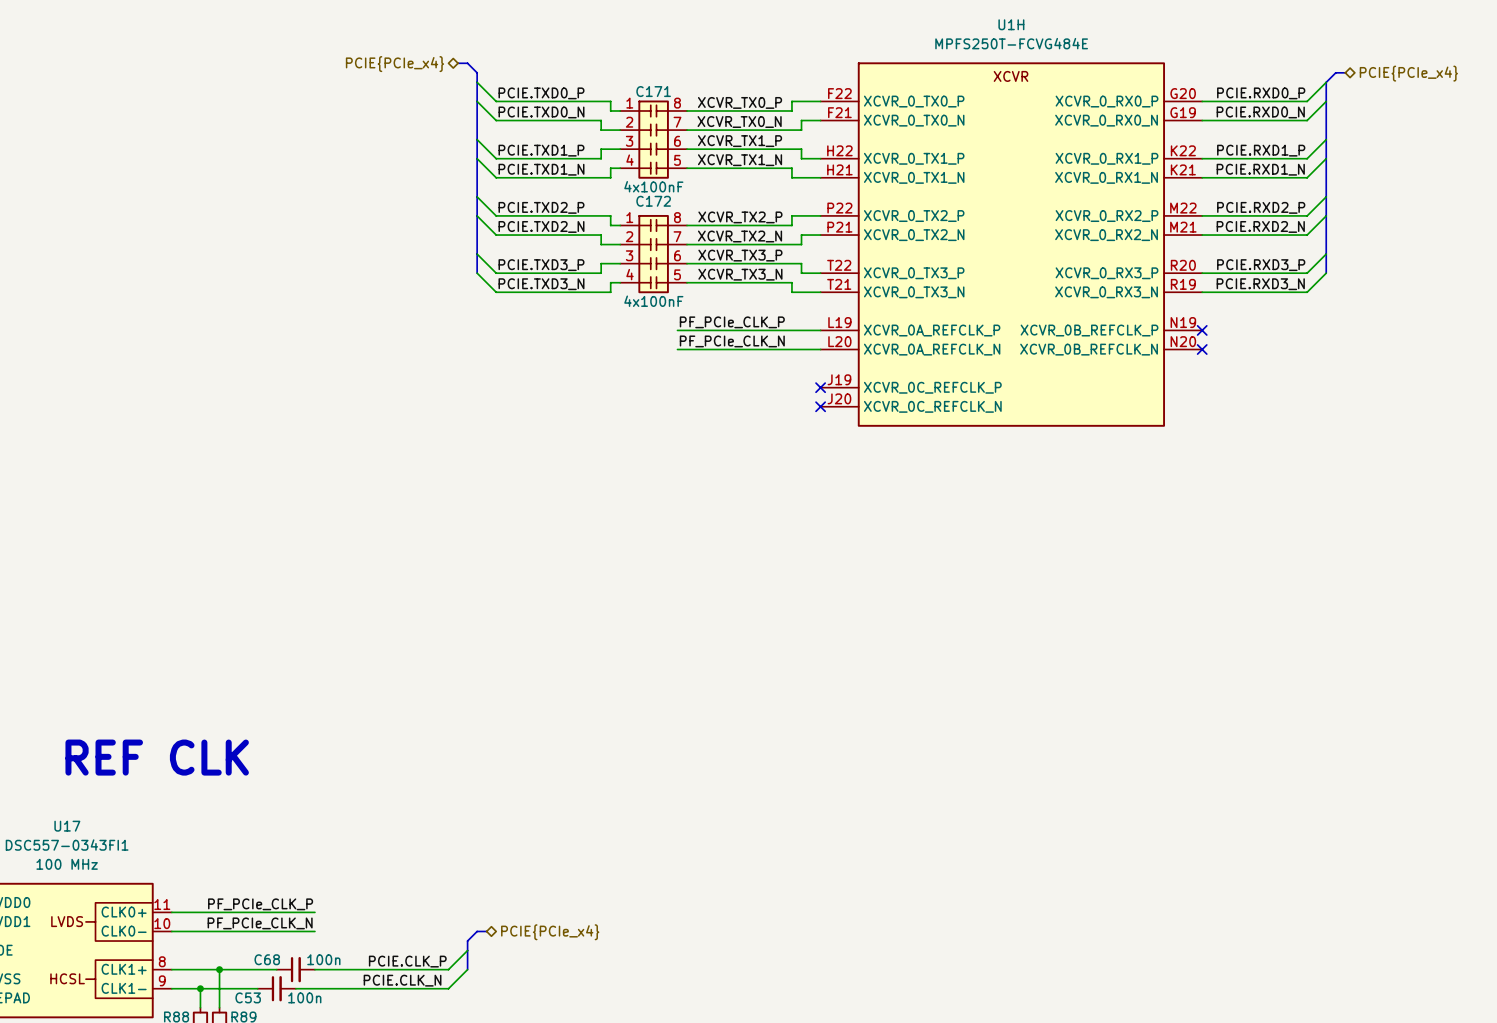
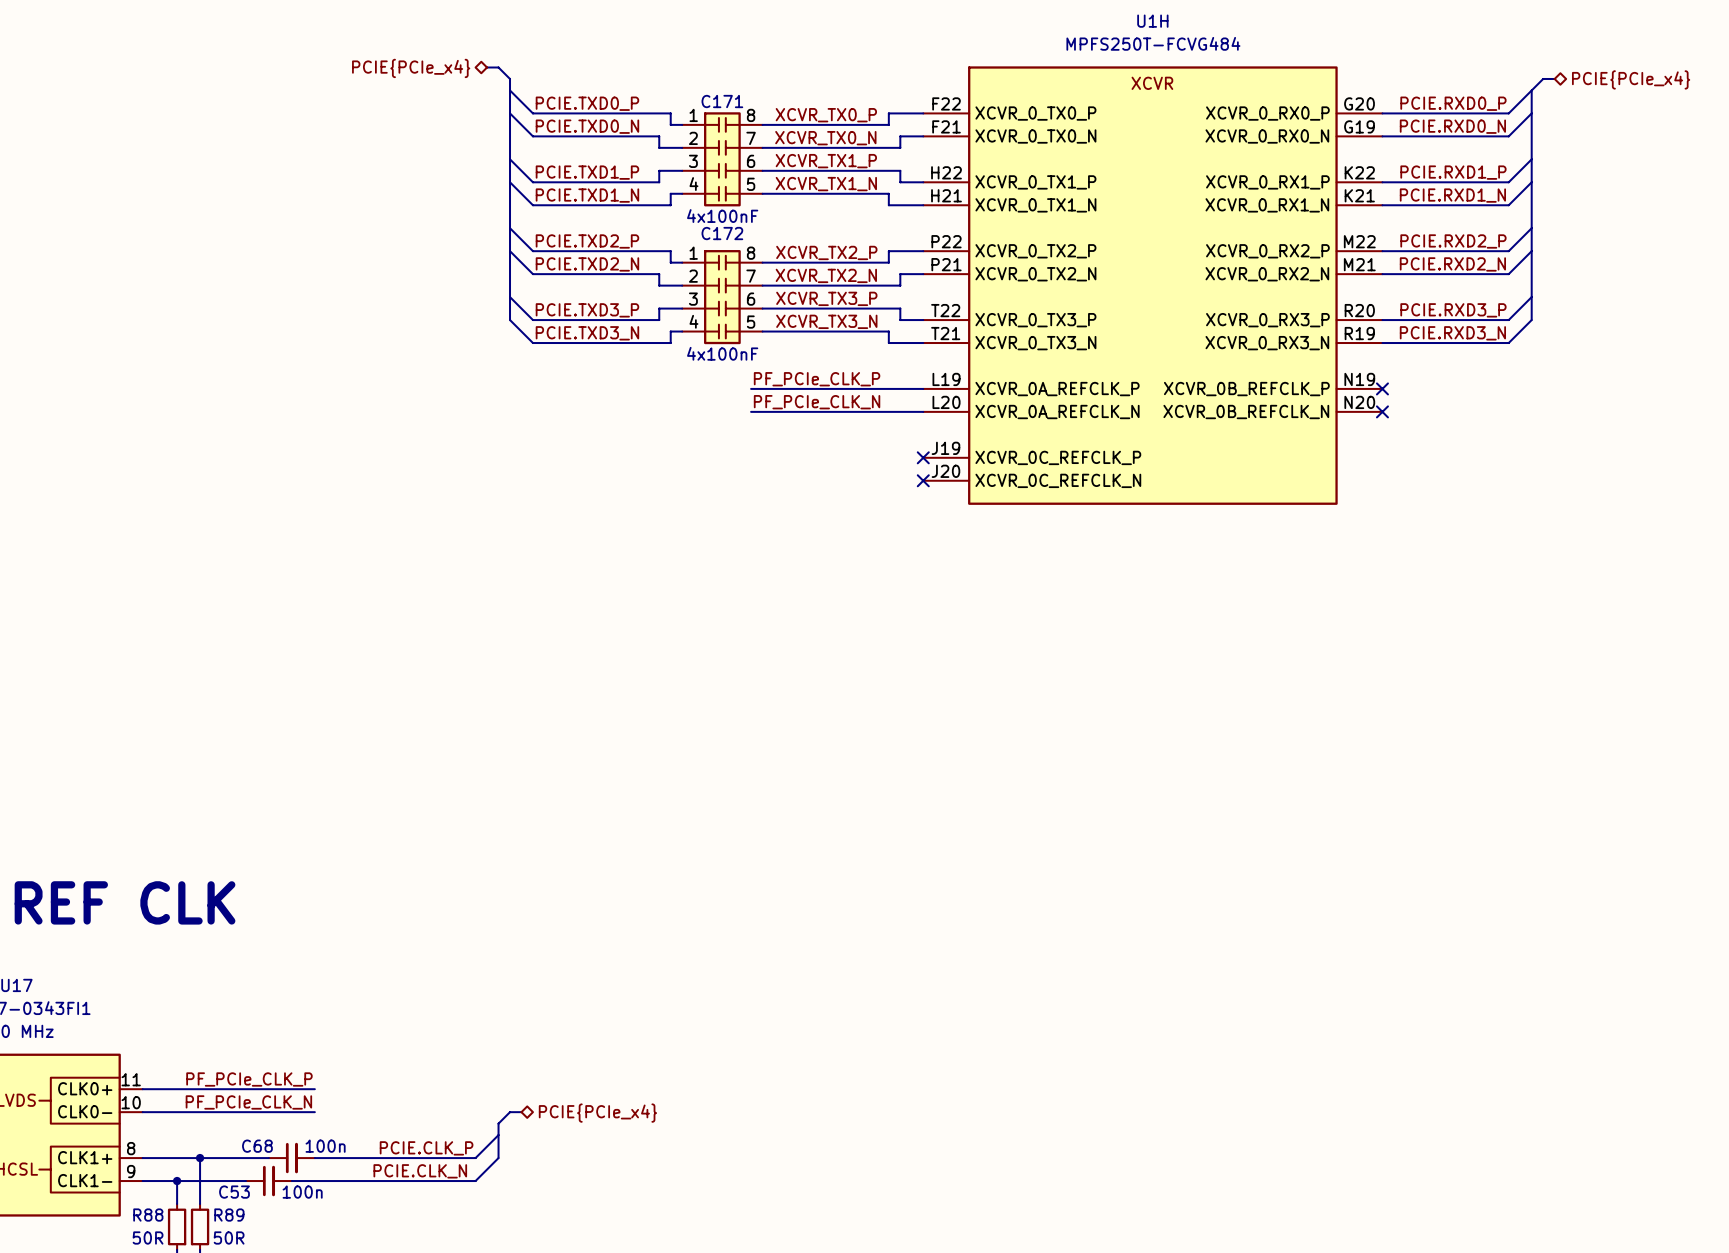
U1H text: MPFS250T-FCVG484E (1011, 43) -> MPFS250T-FCVG484 (1153, 43)

